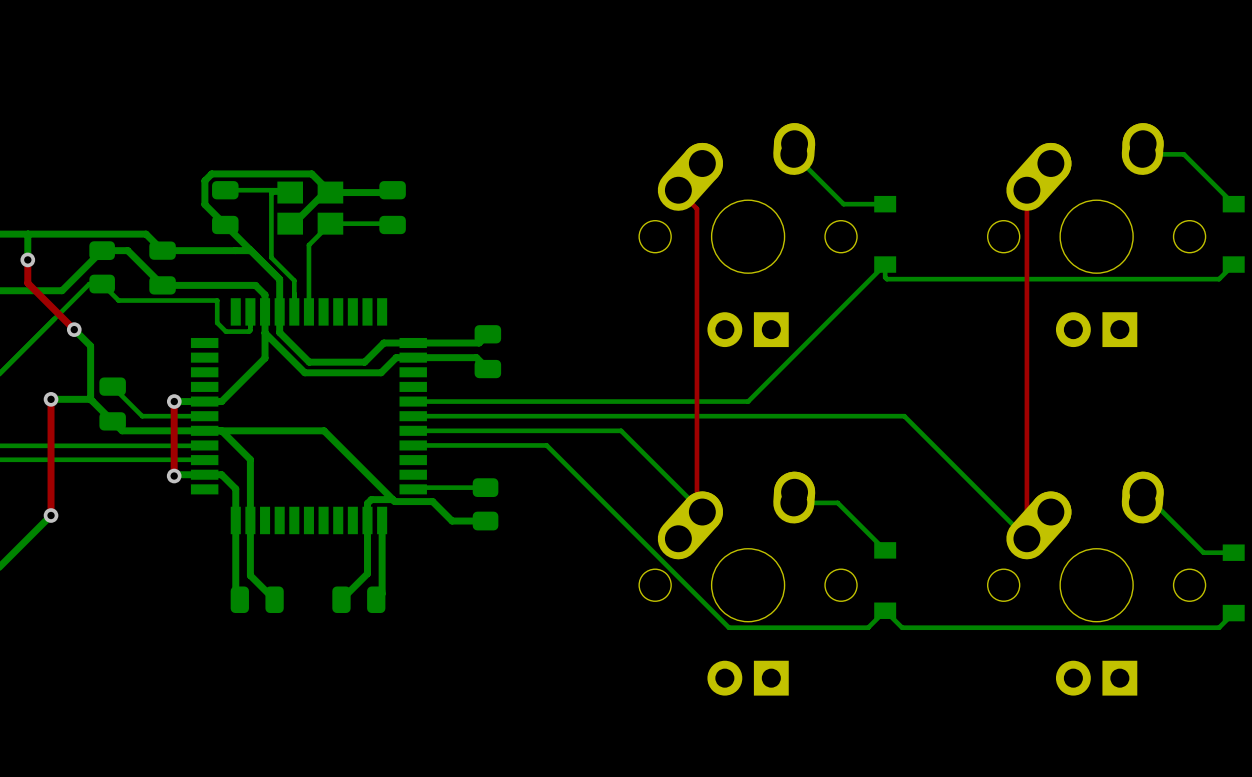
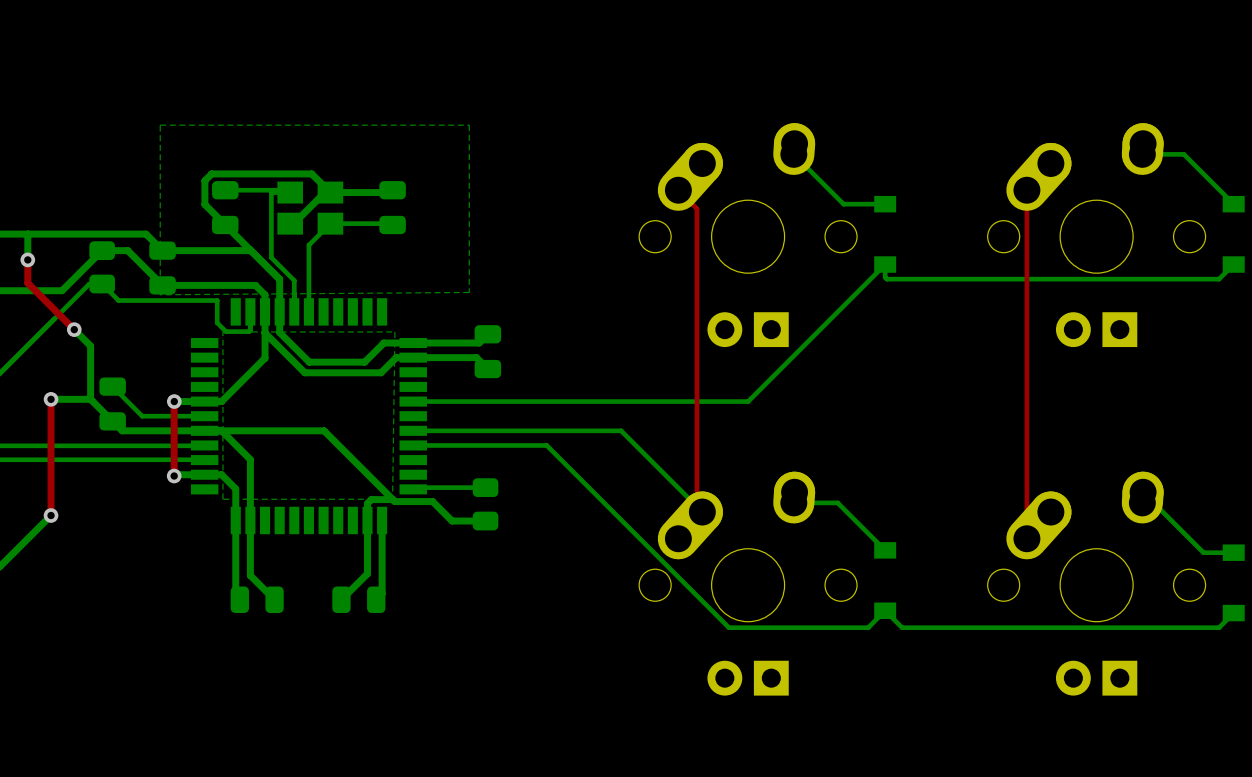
bottom zone outline: none -> (160, 125) (160, 294) (469, 292) (469, 125) (160, 125)
bottom zone outline: none -> (222, 331) (222, 499) (392, 499) (394, 331) (222, 331)
bottom track: (413, 416) (904, 416) (1026, 538) -> none

